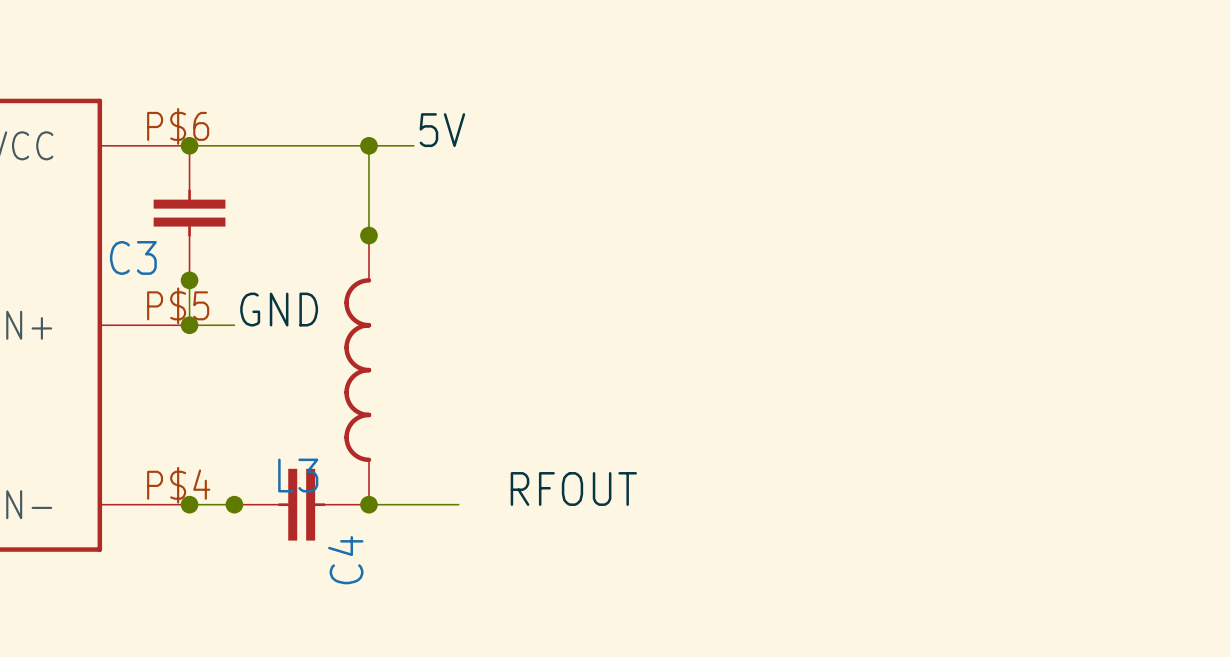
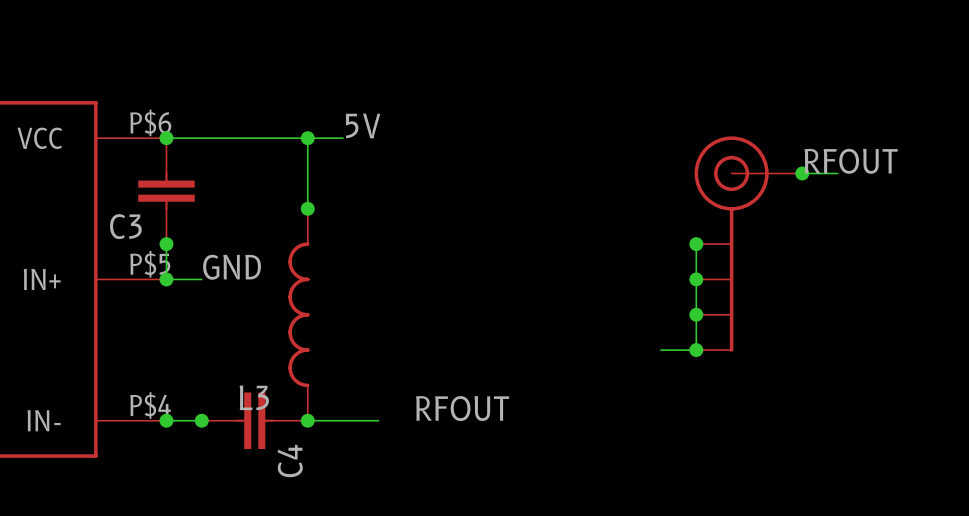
label: none -> RFOUT (851, 161)
wire: none -> (802, 173) (837, 173)
junction: none -> (802, 173)
wire: none -> (696, 244) (696, 350) (660, 350)
junction: none -> (696, 244)
part: none -> (748, 244)
junction: none -> (696, 279)
junction: none -> (696, 314)
junction: none -> (696, 350)

